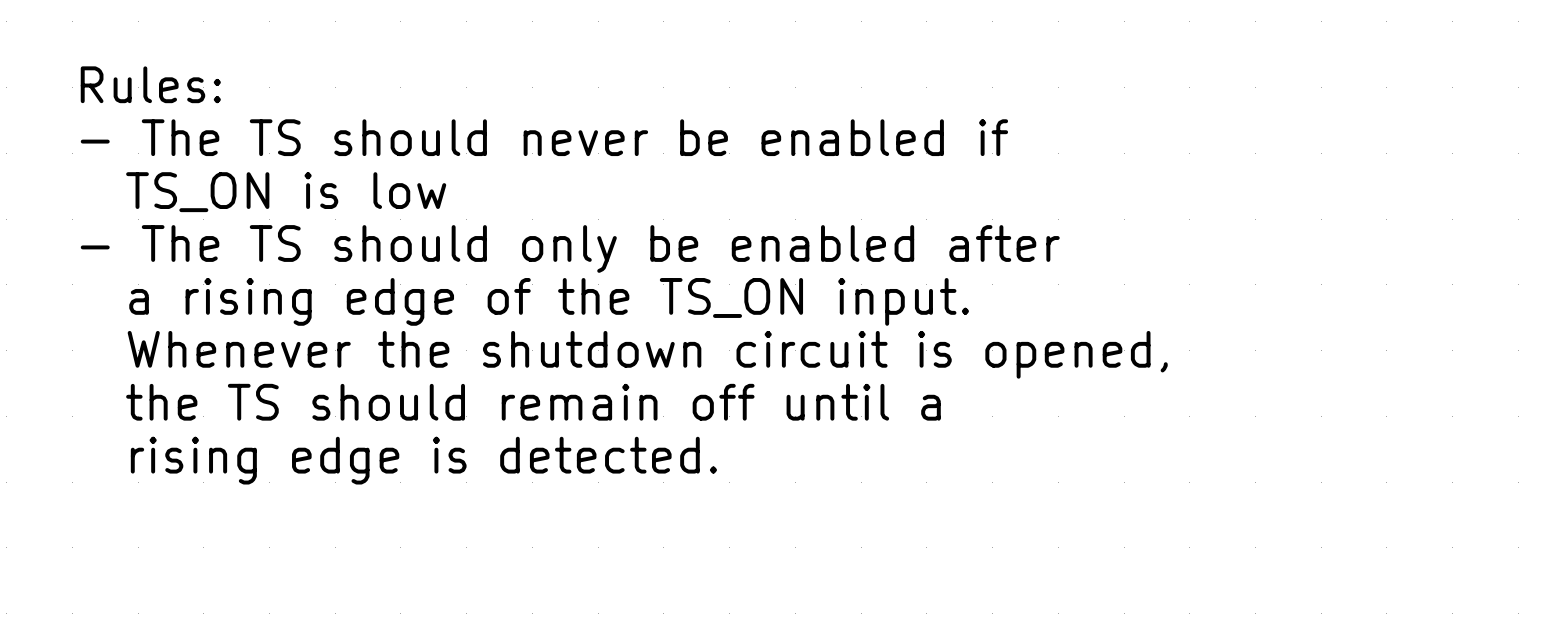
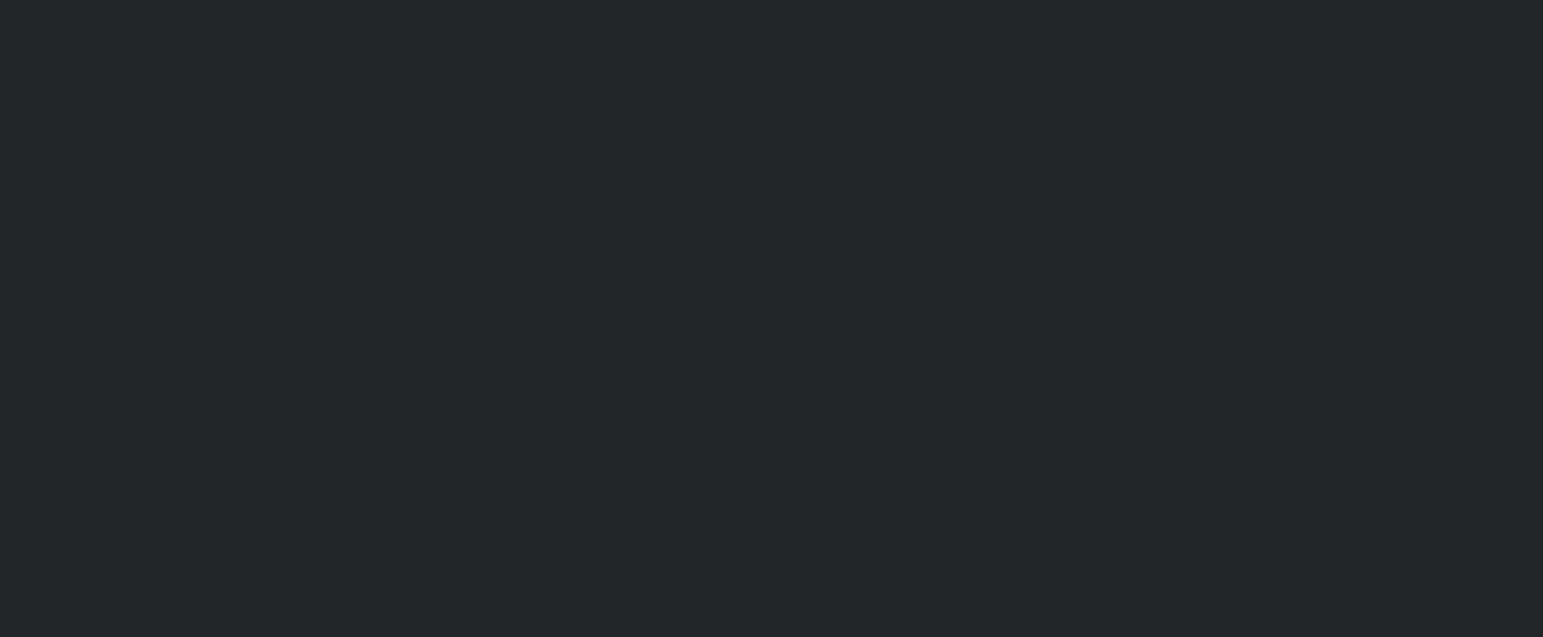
text: Rules: (150, 84) -> none
text: - The TS should never be enabled if (544, 137) -> none
text: TS_ON is low (286, 192) -> none
text: - The TS should only be enabled after (570, 248) -> none
text: a rising edge of the TS_ON input. (549, 301) -> none
text: Whenever the shutdown circuit is opened, (647, 354) -> none
text: the TS should remain off until a (533, 402) -> none
text: rising edge is detected. (423, 460) -> none

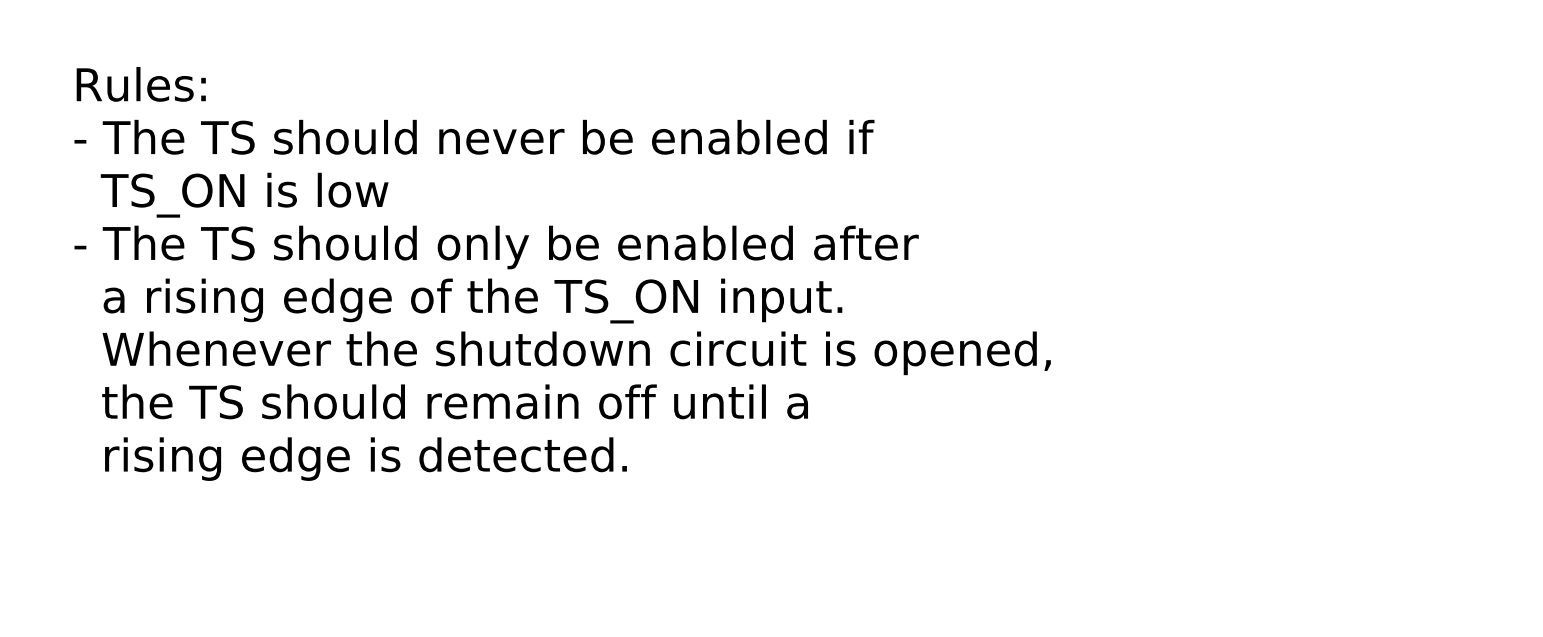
text: none -> Rules: (141, 84)
text: none -> - The TS should never be enabled if (474, 137)
text: none -> TS_ON is low (244, 195)
text: none -> - The TS should only be enabled after (496, 247)
text: none -> a rising edge of the TS_ON input. (472, 301)
text: none -> Whenever the shutdown circuit is opened, (576, 353)
text: none -> the TS should remain off until a (455, 401)
text: none -> rising edge is detected. (366, 459)

